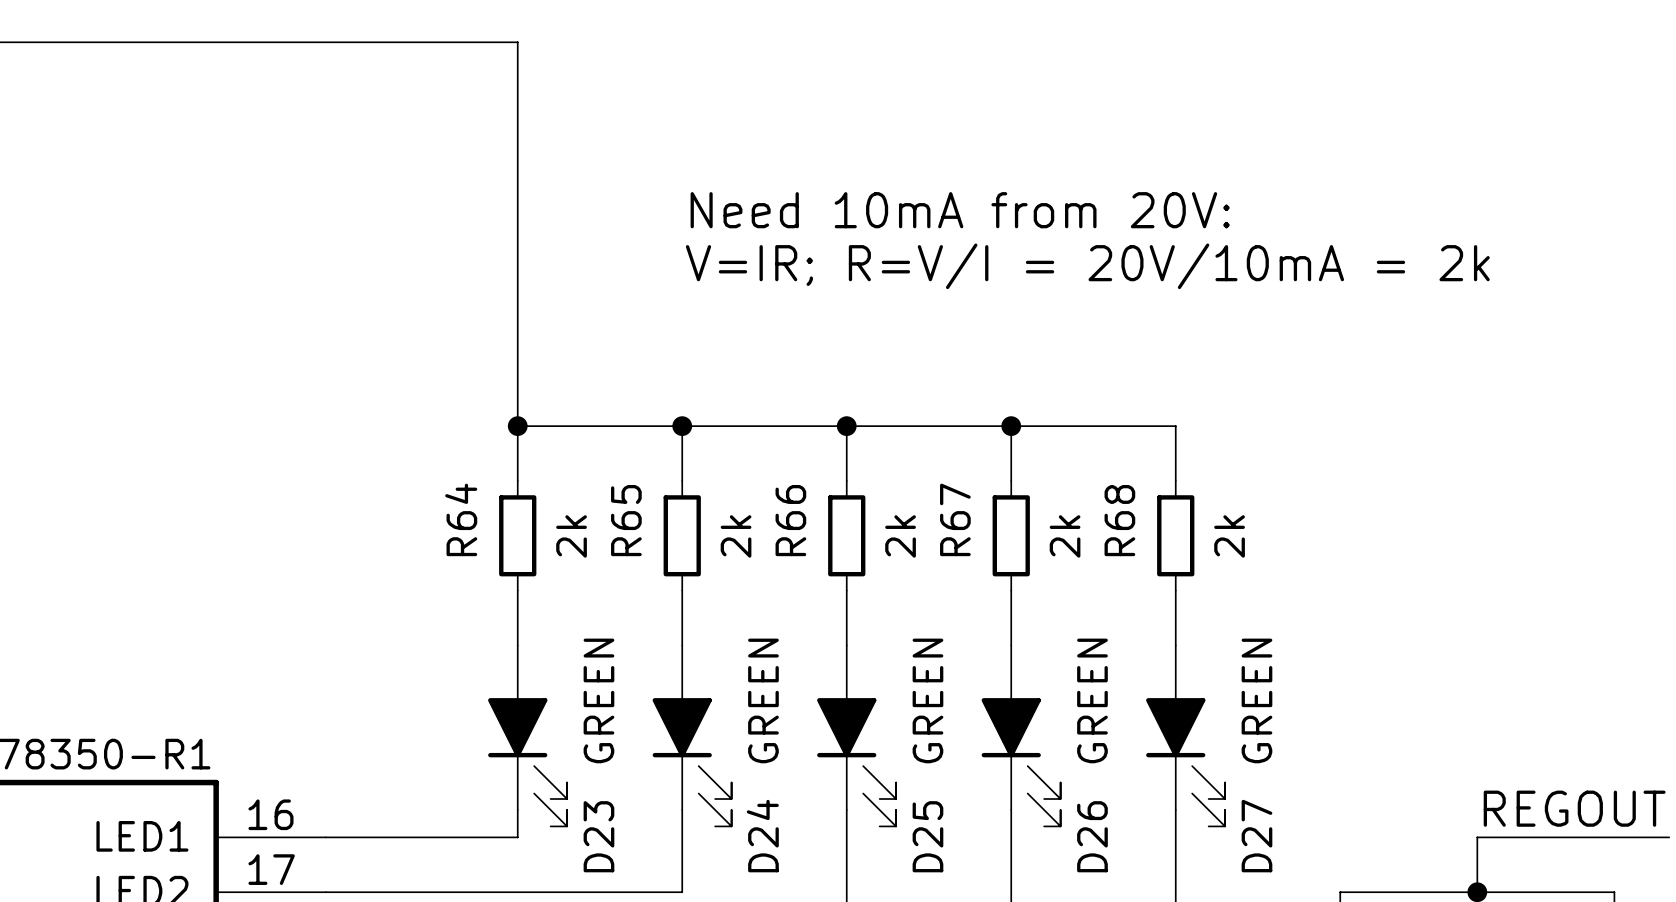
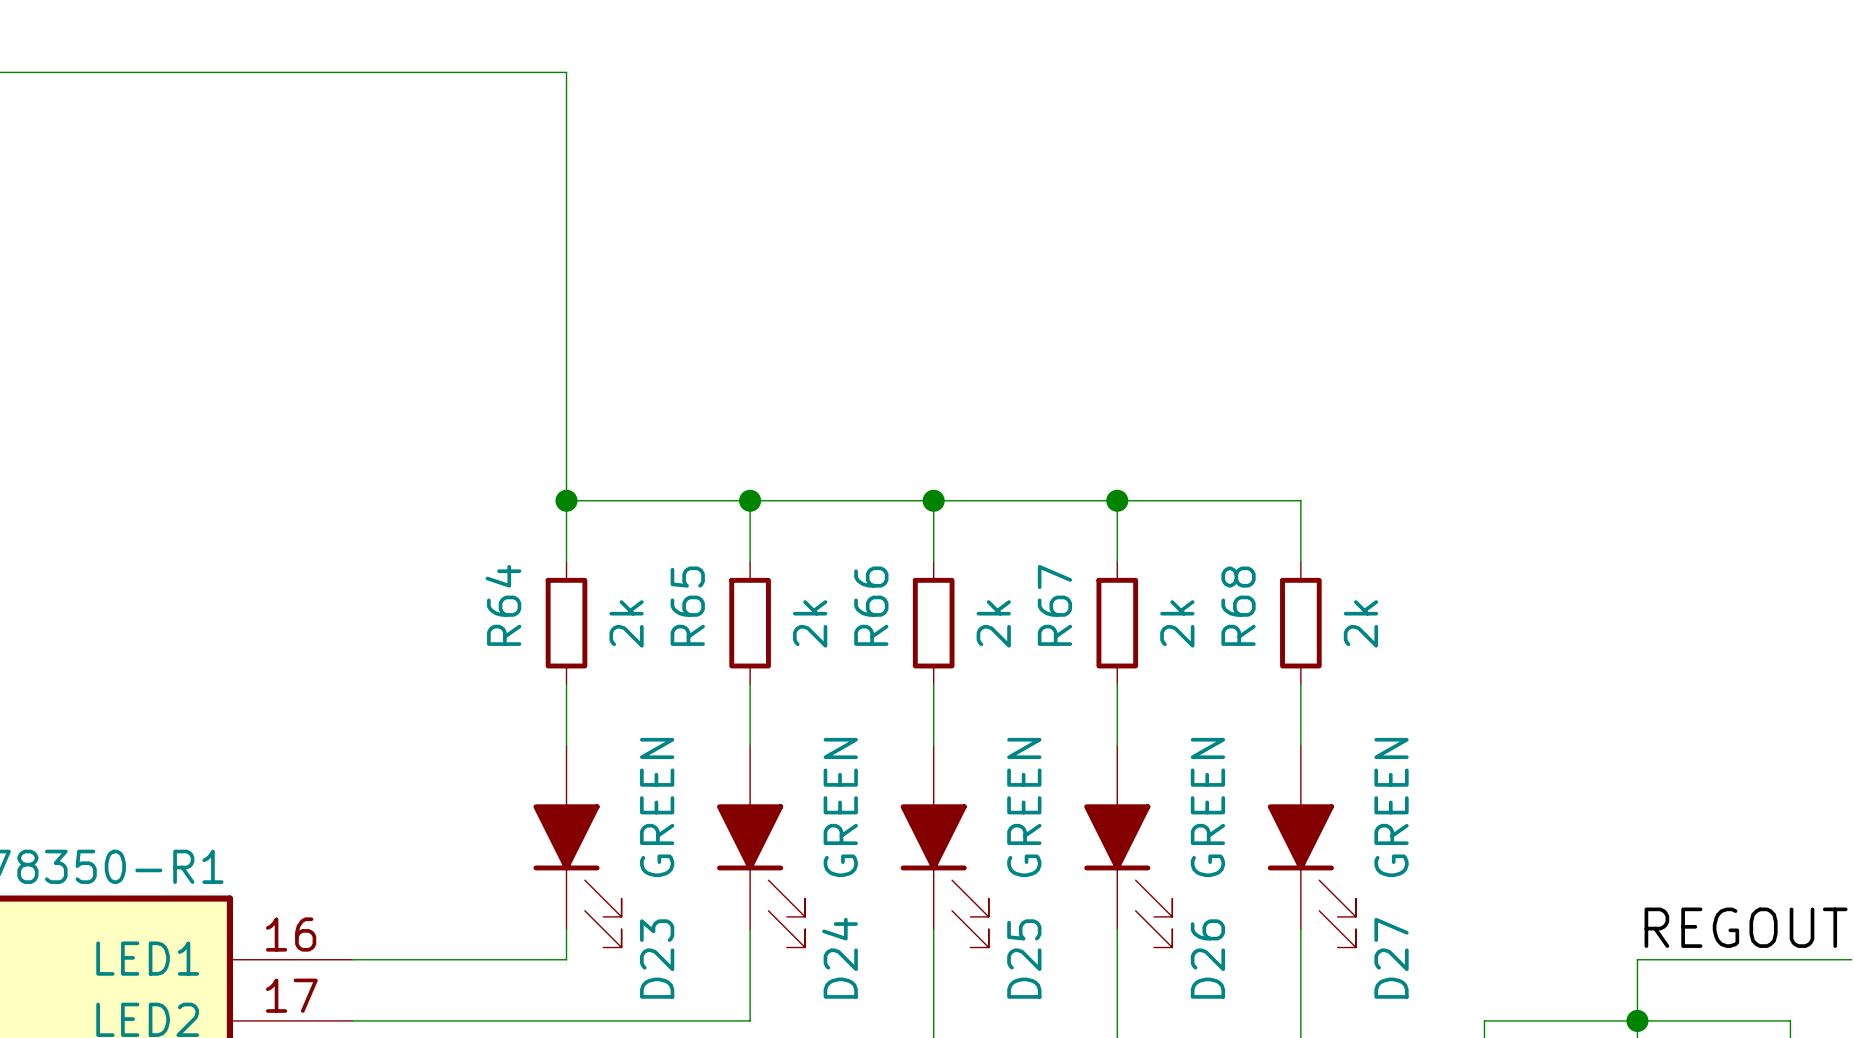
text: Need 10mA from 20V: (960, 210) -> none
text: V=IR; R=V/I = 20V/10mA = 2k (1087, 266) -> none

